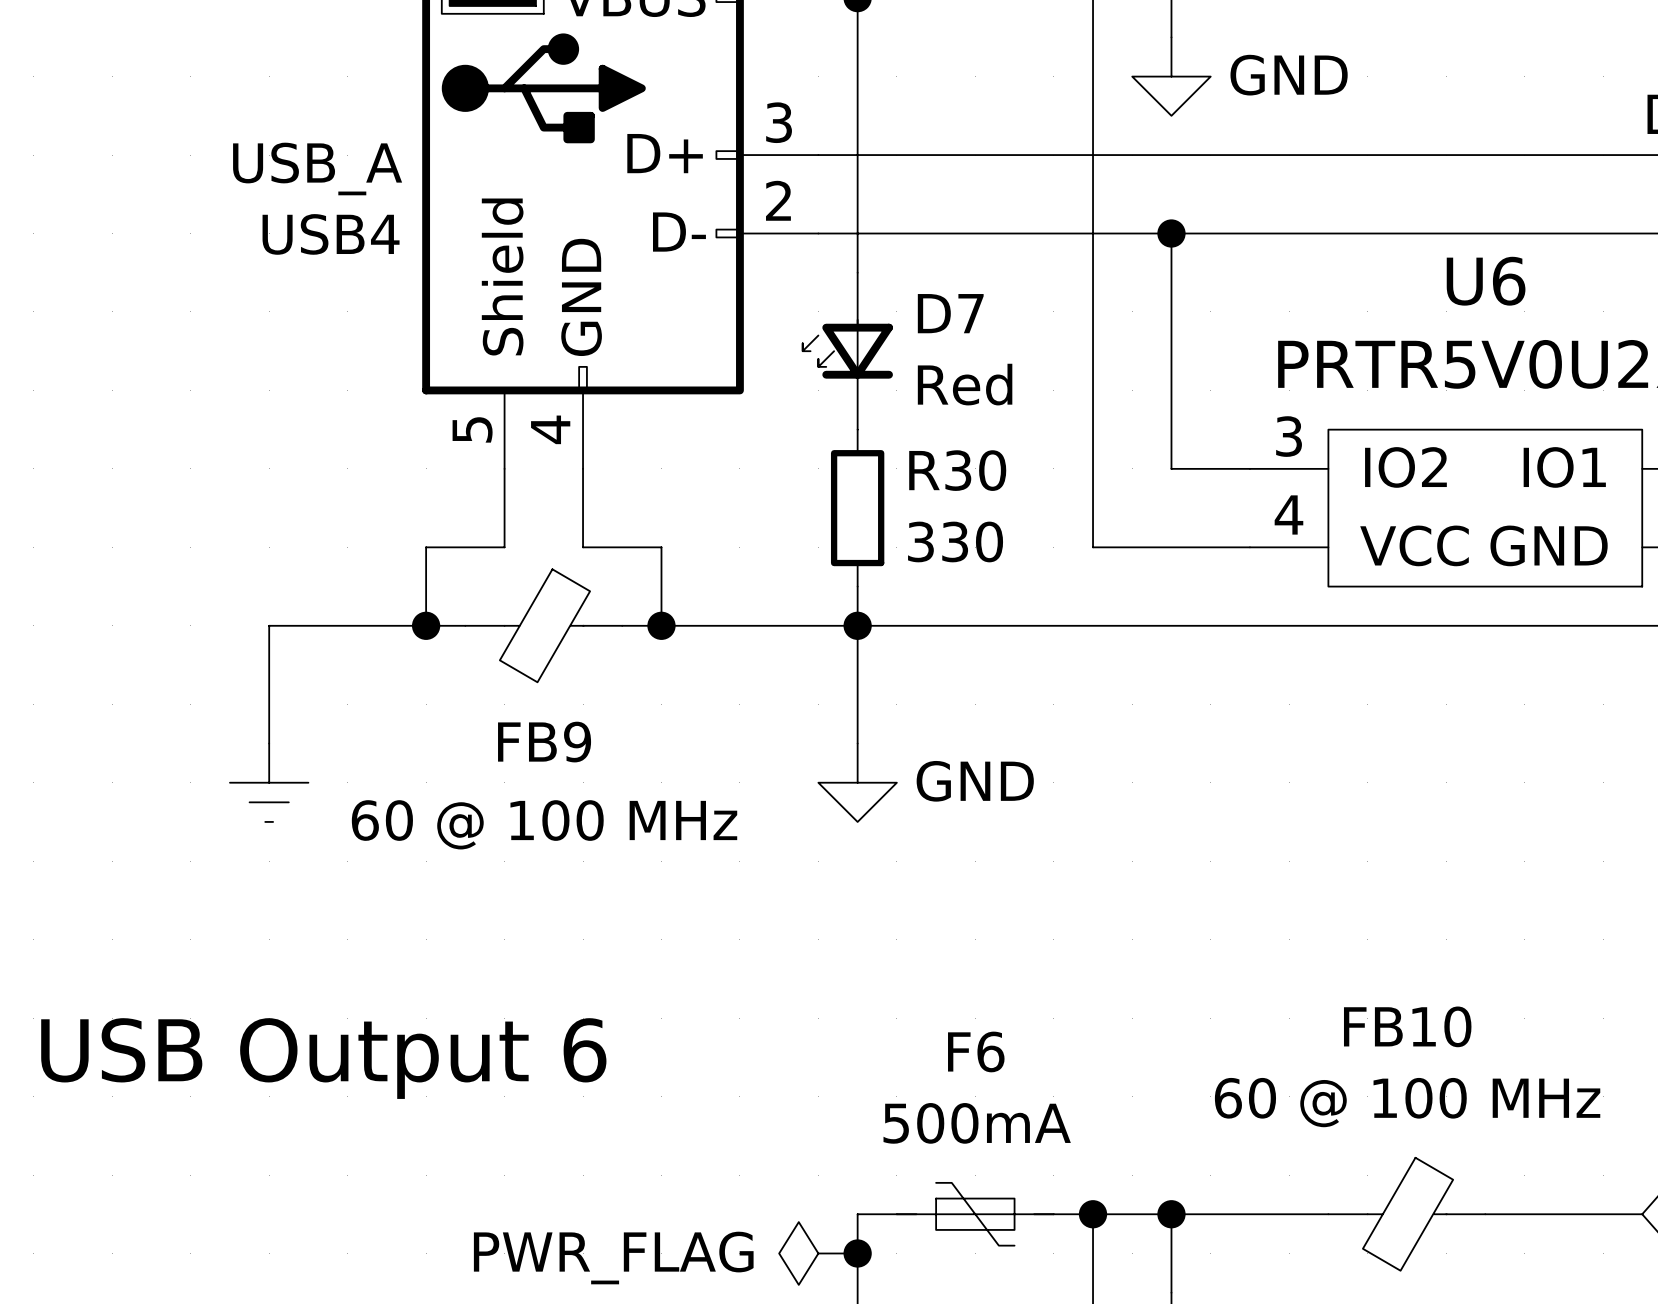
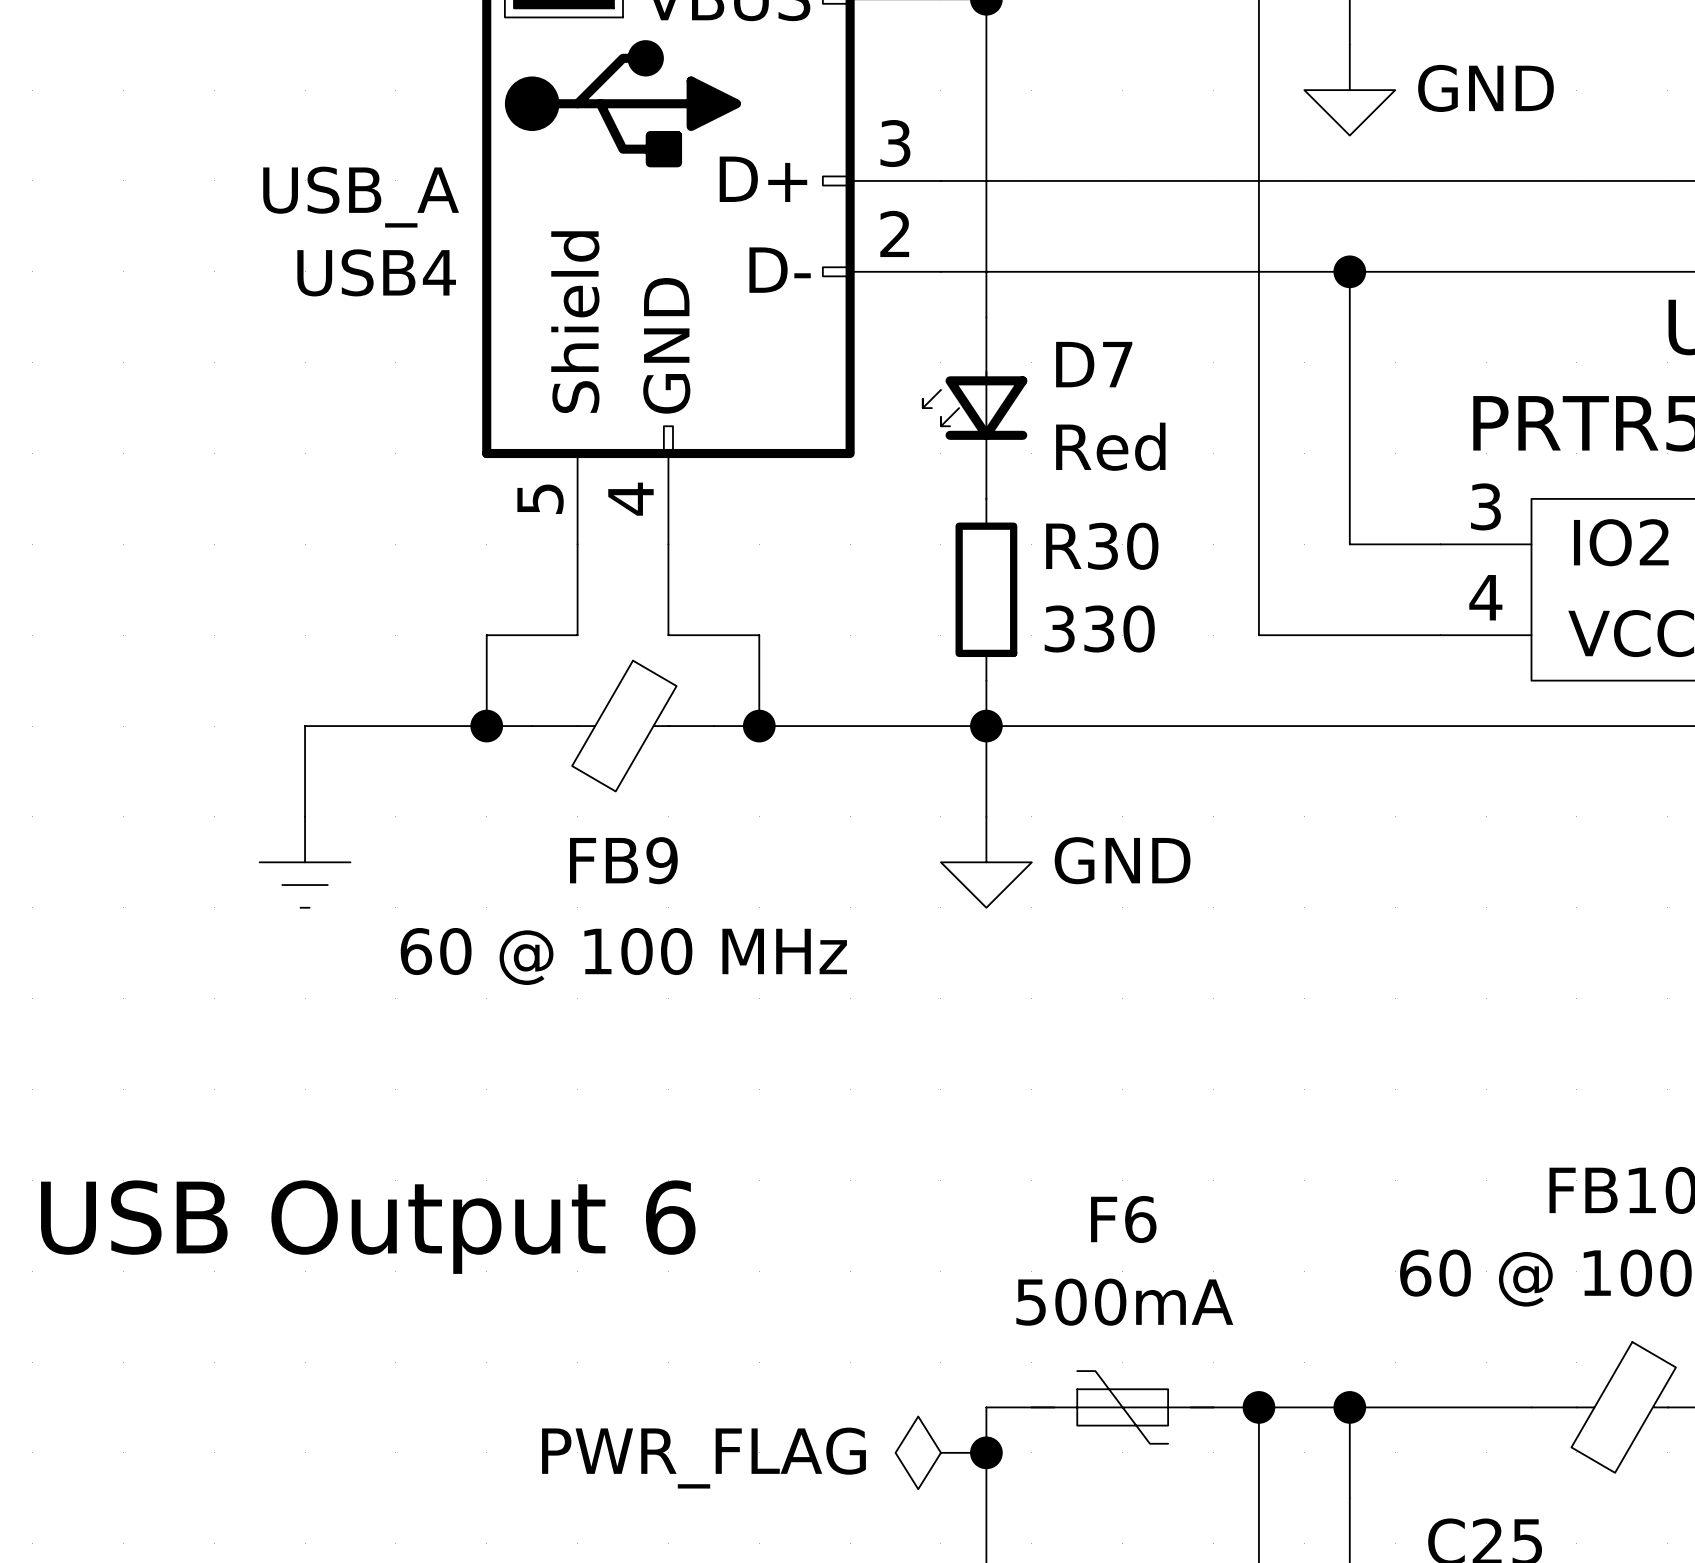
power symbol position: (269, 782) -> (305, 862)
power symbol position: GND (857, 782) -> GND (986, 862)

